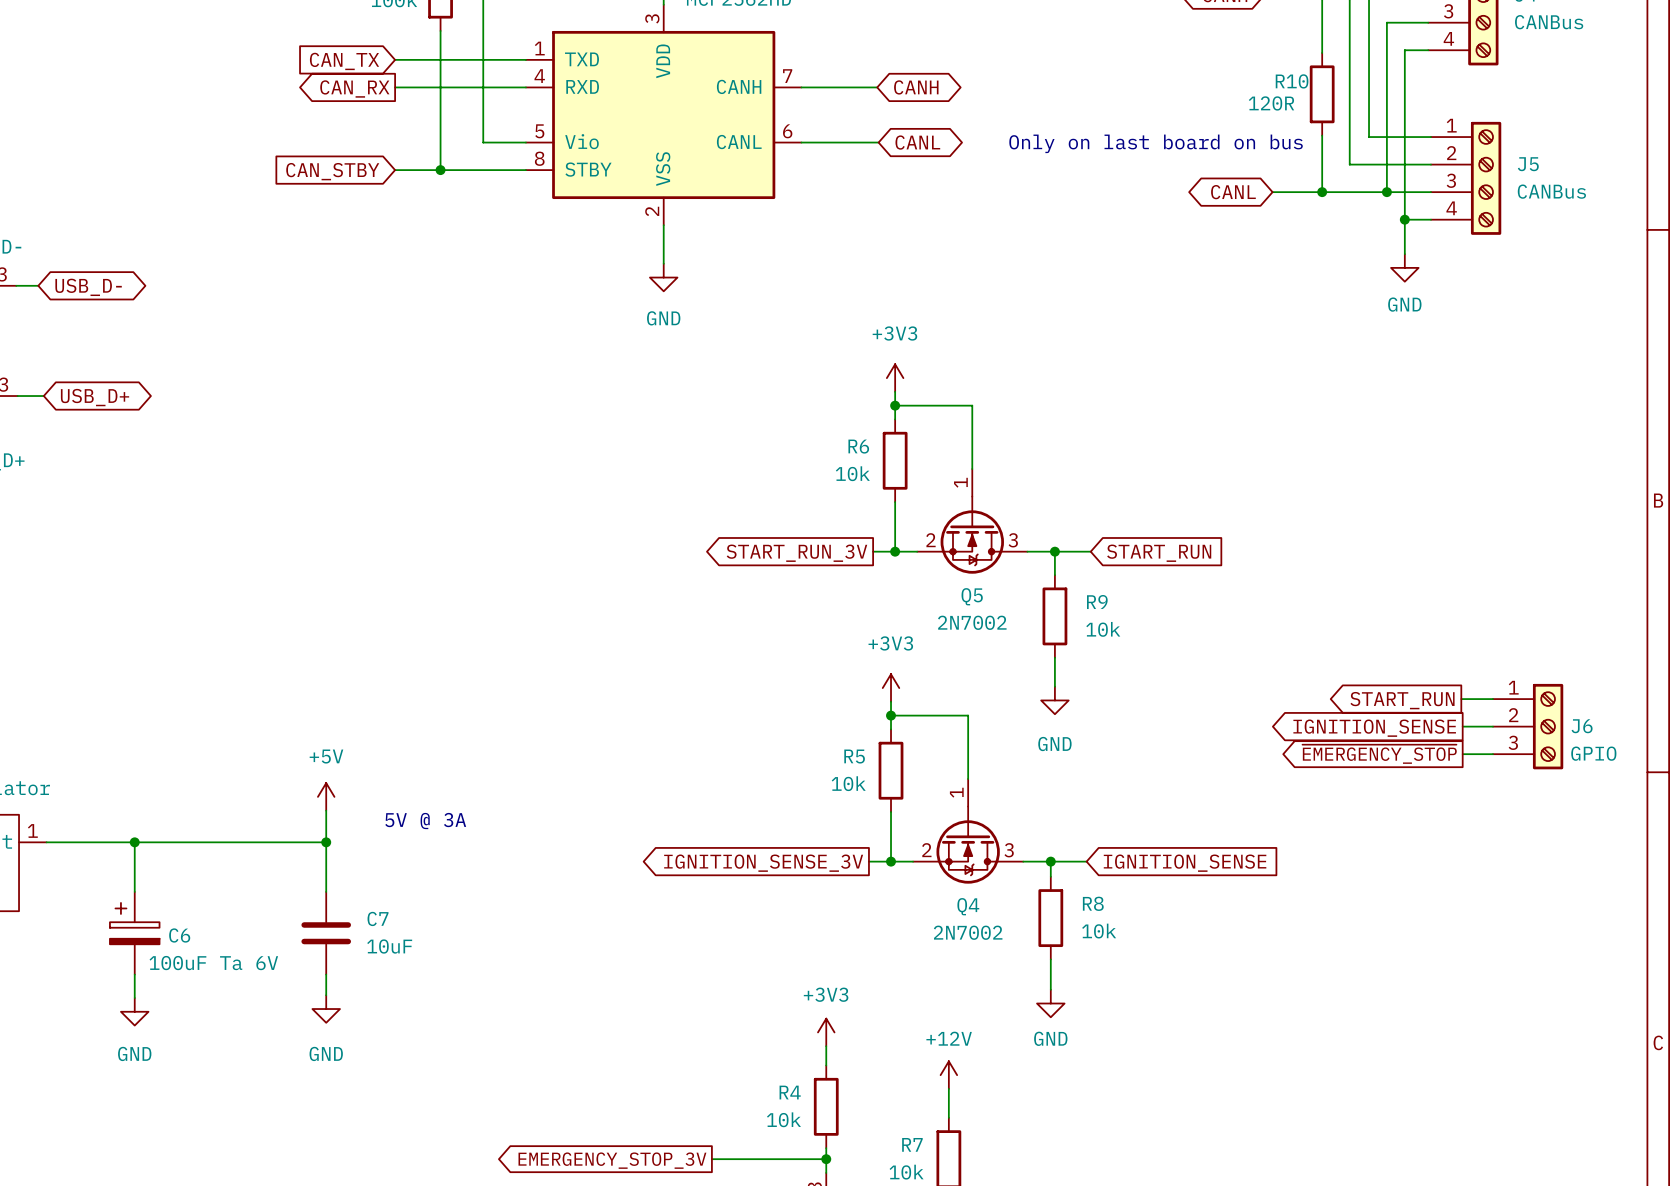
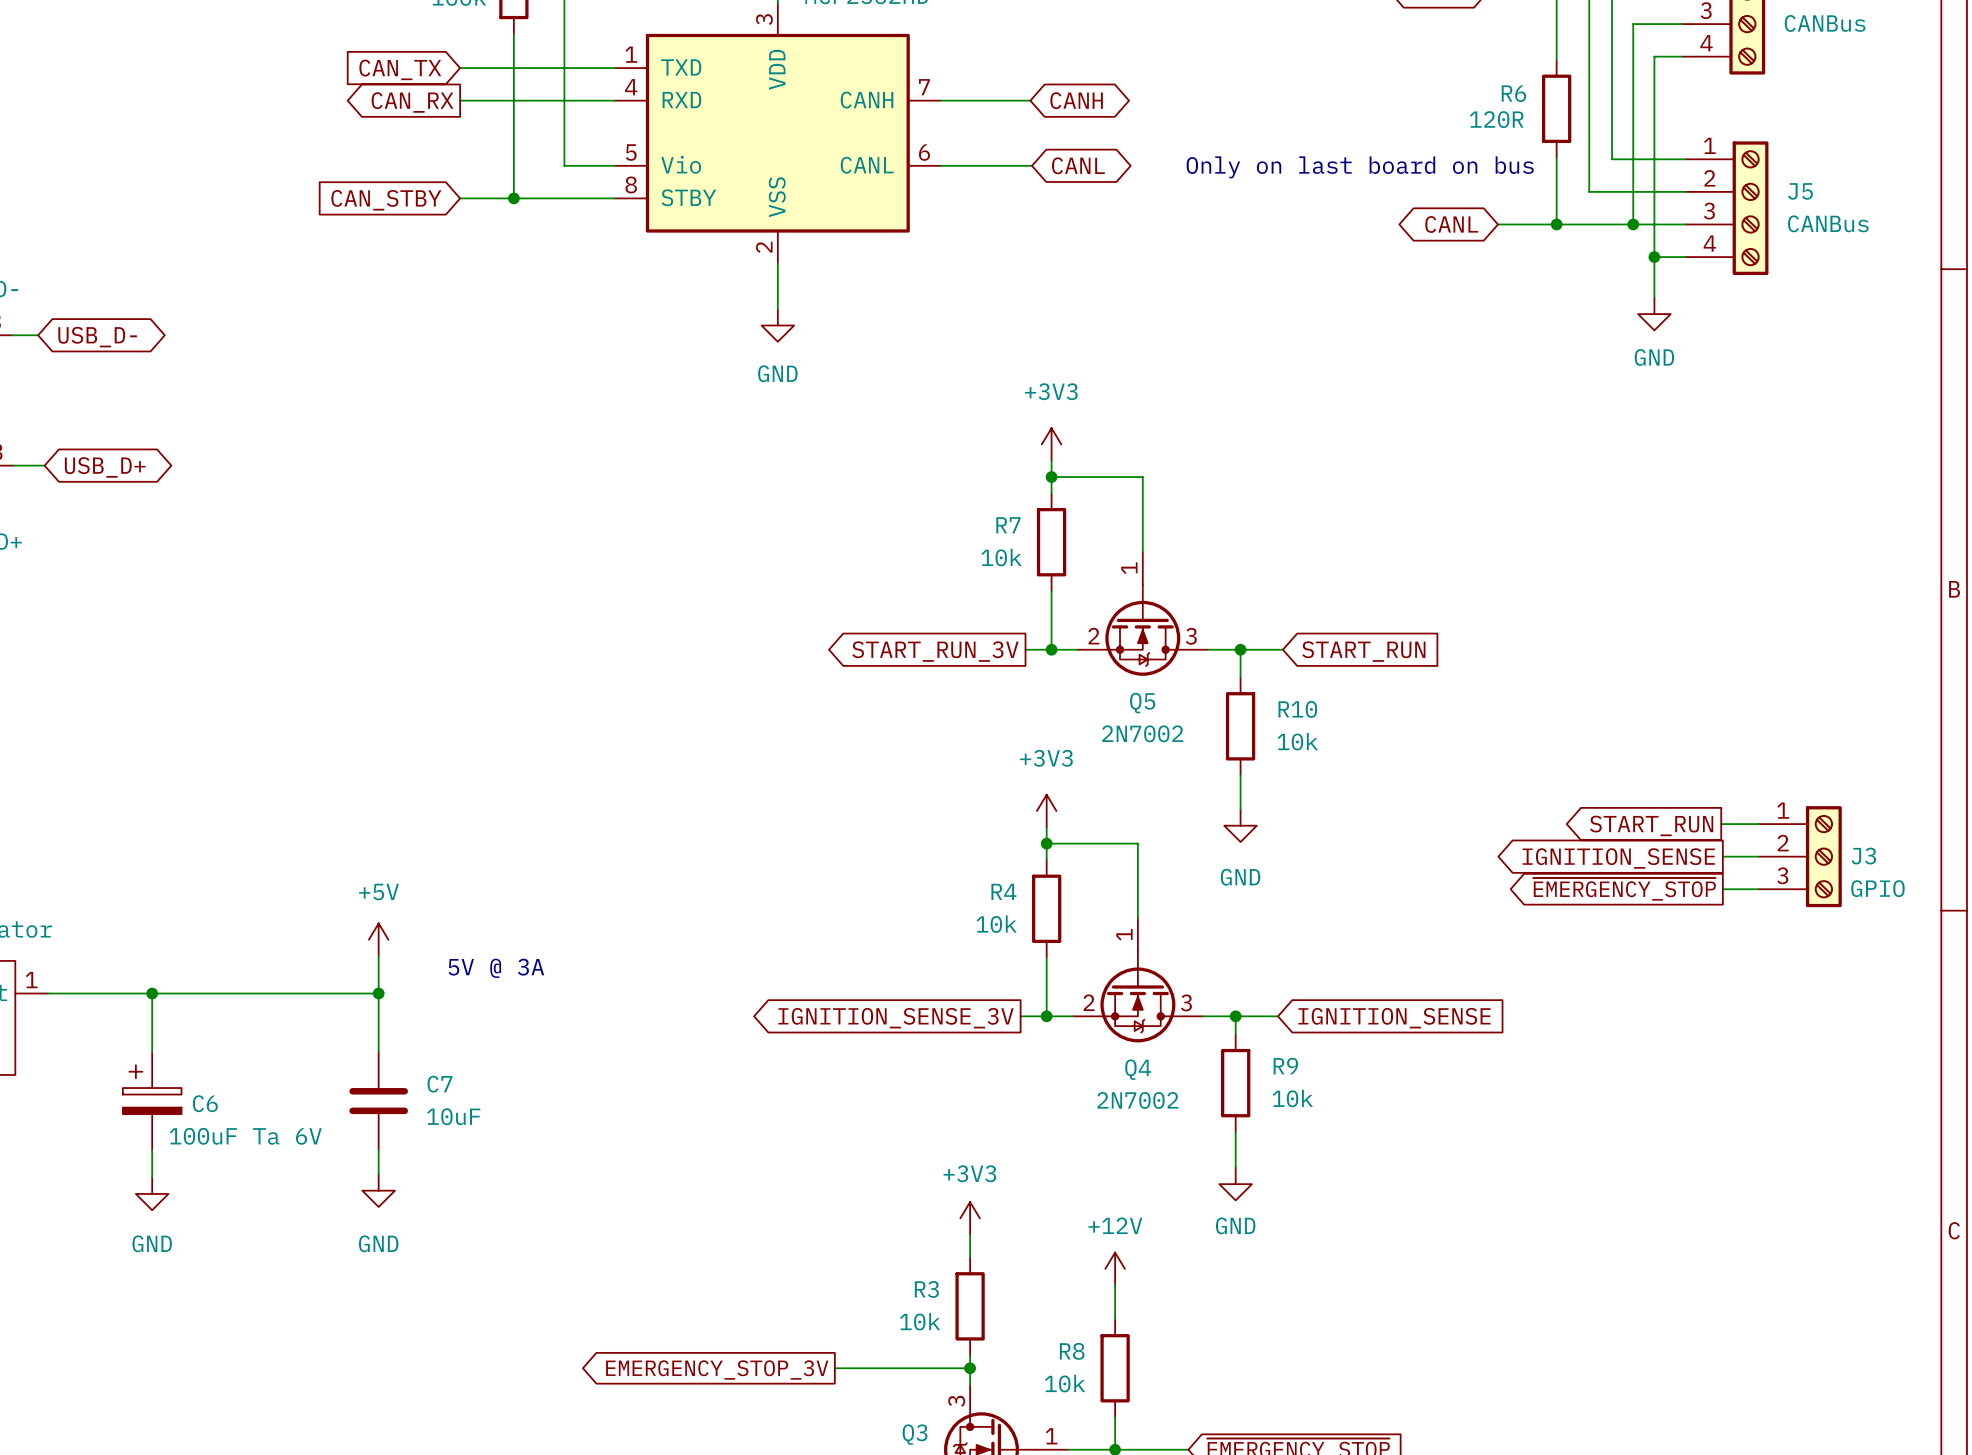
R10 name: R10 (1292, 81) -> R6 (1513, 93)
R6 name: R6 (858, 446) -> R7 (1008, 525)
R9 name: R9 (1097, 602) -> R10 (1297, 709)
J6 name: J6 (1582, 726) -> J3 (1863, 856)
R5 name: R5 (854, 756) -> R4 (1003, 891)
R8 name: R8 (1093, 903) -> R9 (1285, 1066)
R4 name: R4 (790, 1092) -> R3 (926, 1289)
R7 name: R7 (912, 1144) -> R8 (1072, 1351)

